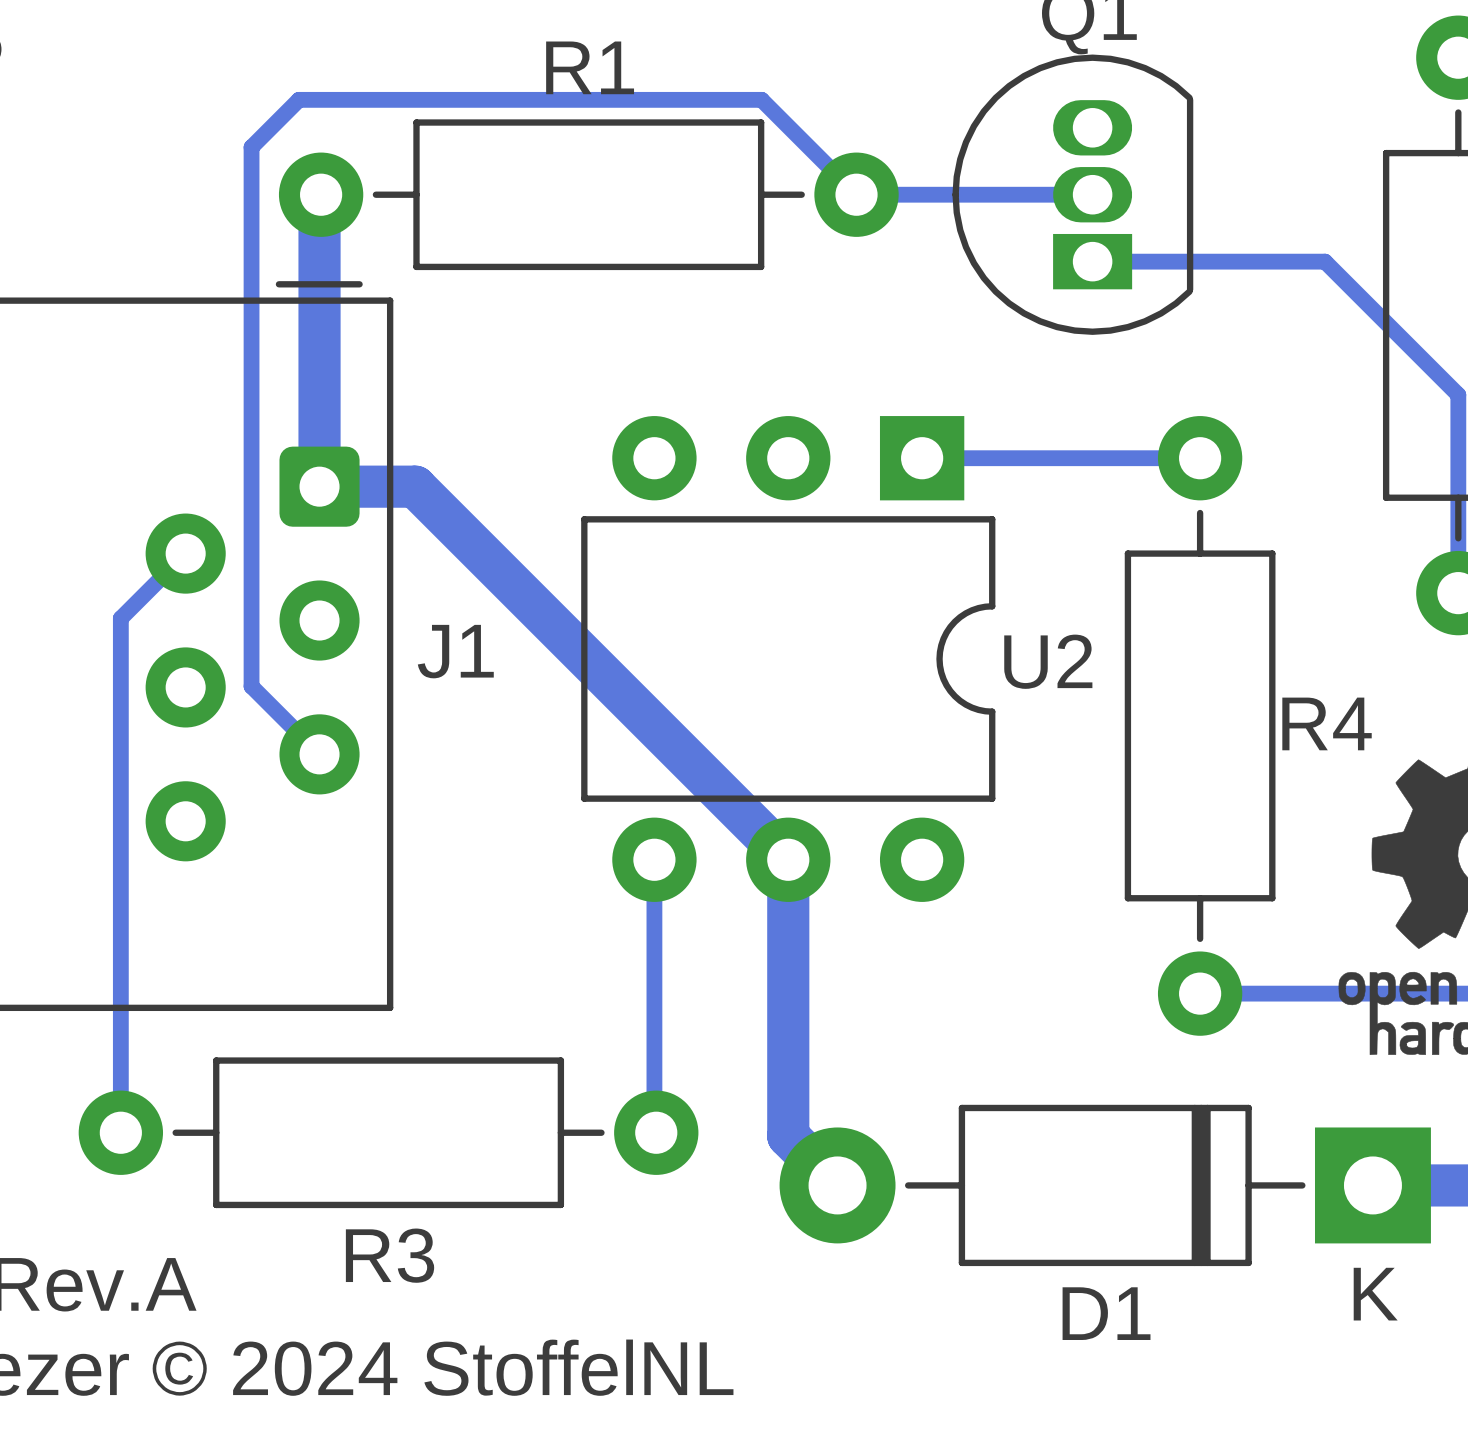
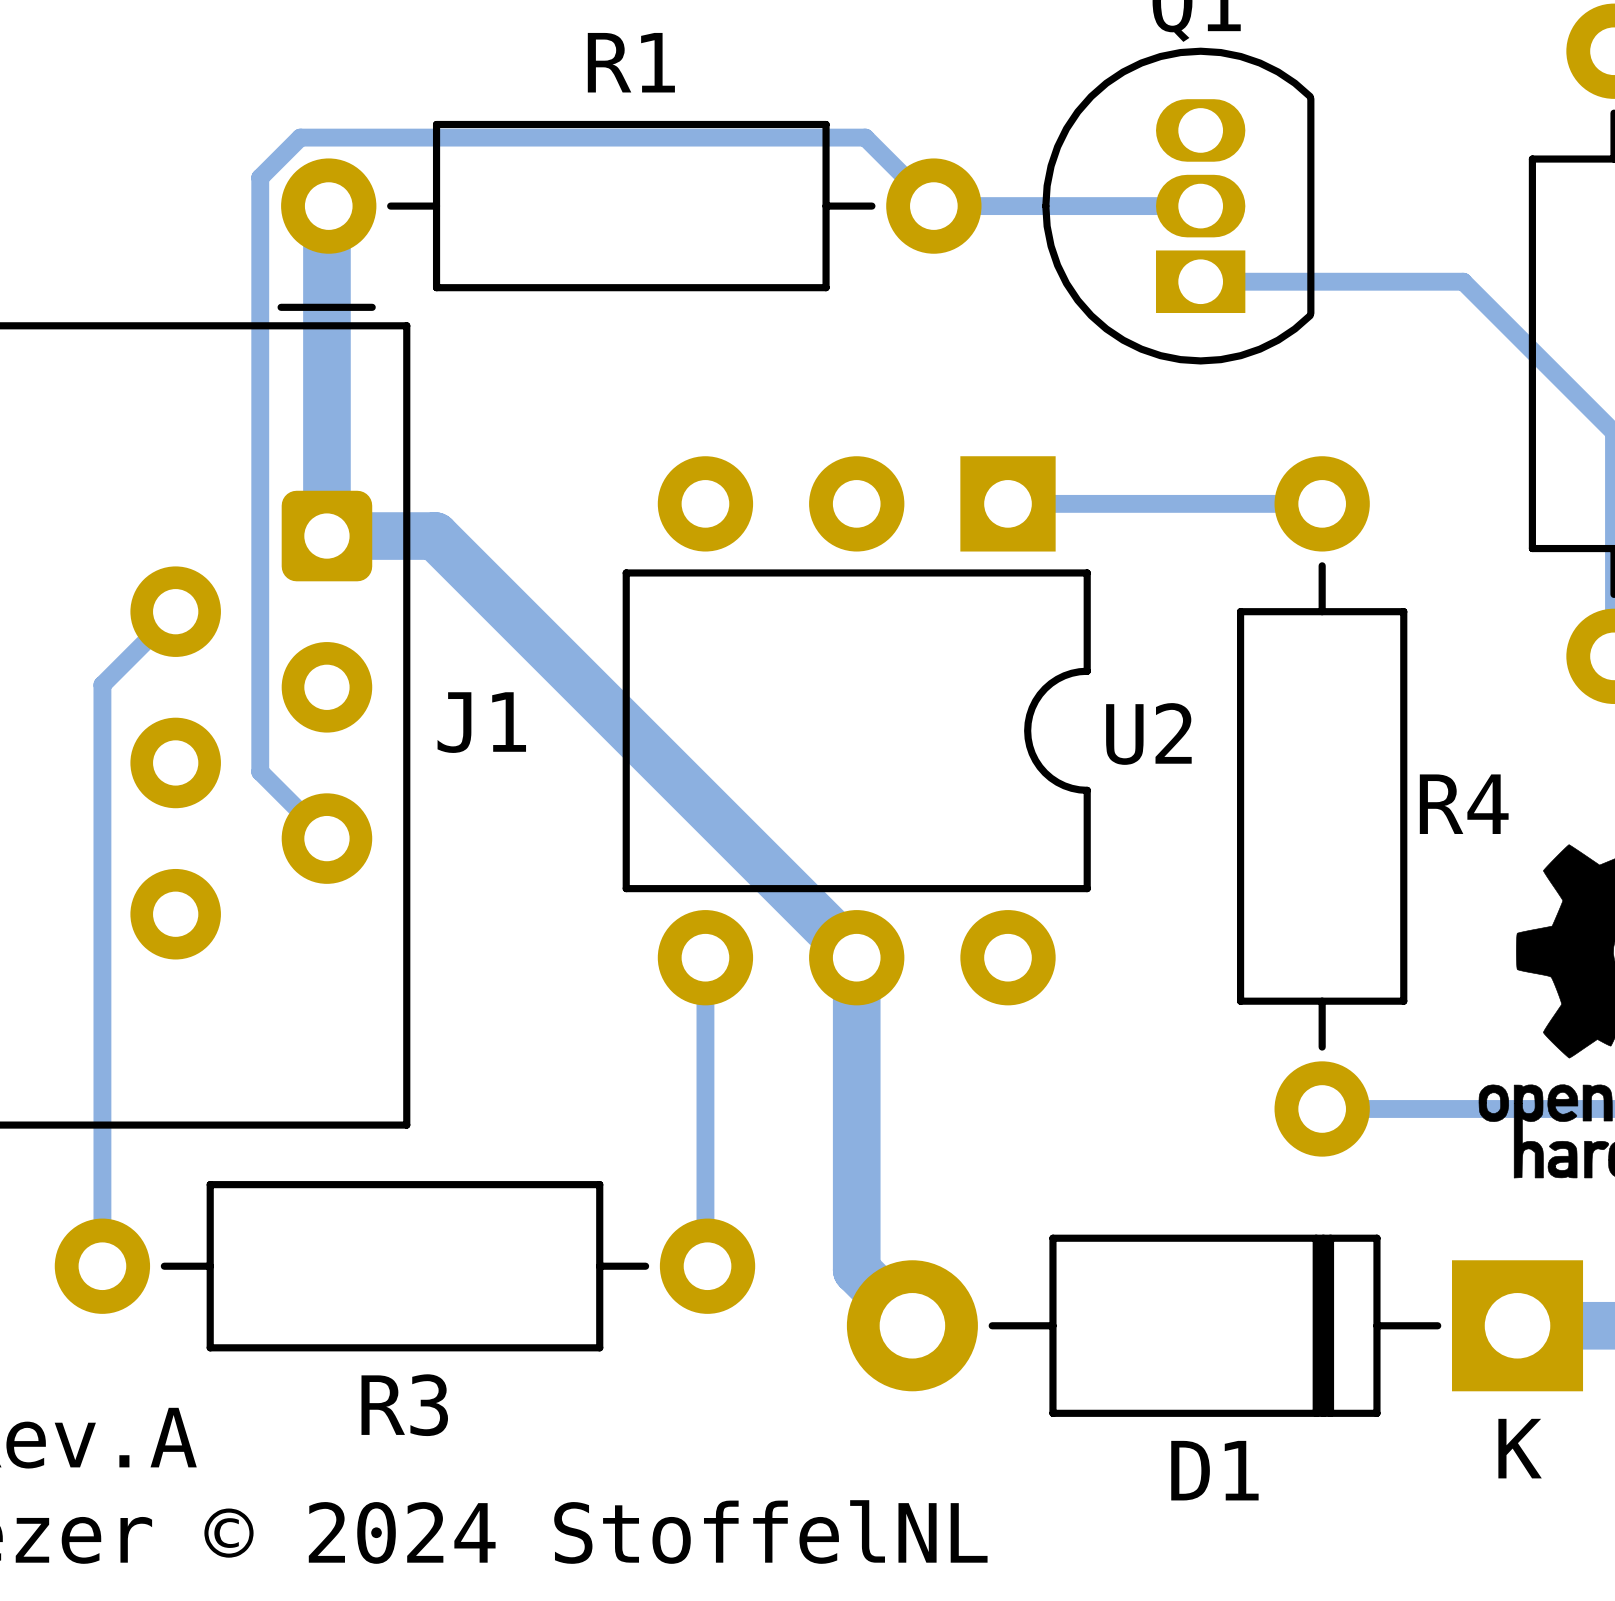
bottom track: (795, 134) (761, 99) (298, 99) (251, 147) (251, 686) (260, 695) -> (865, 137) (300, 137) (260, 177) (260, 771)

